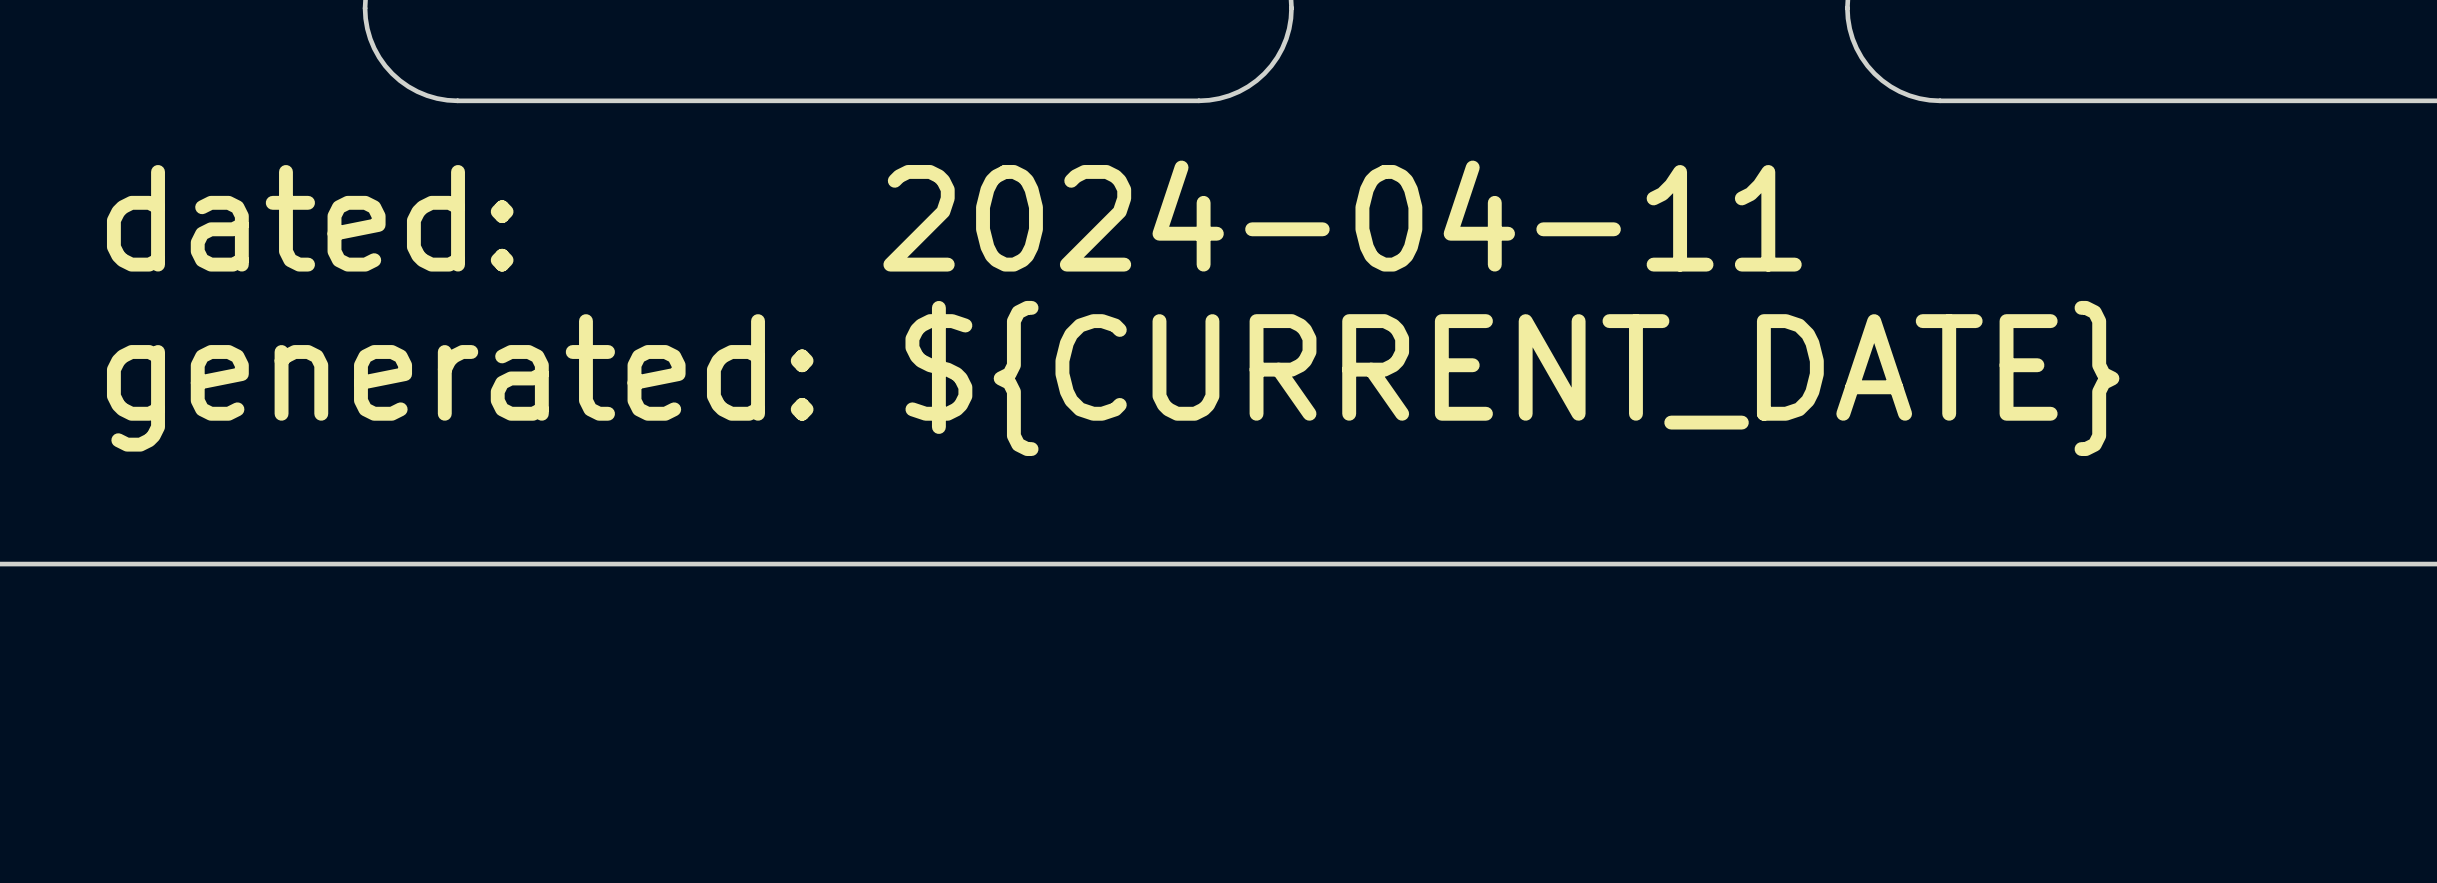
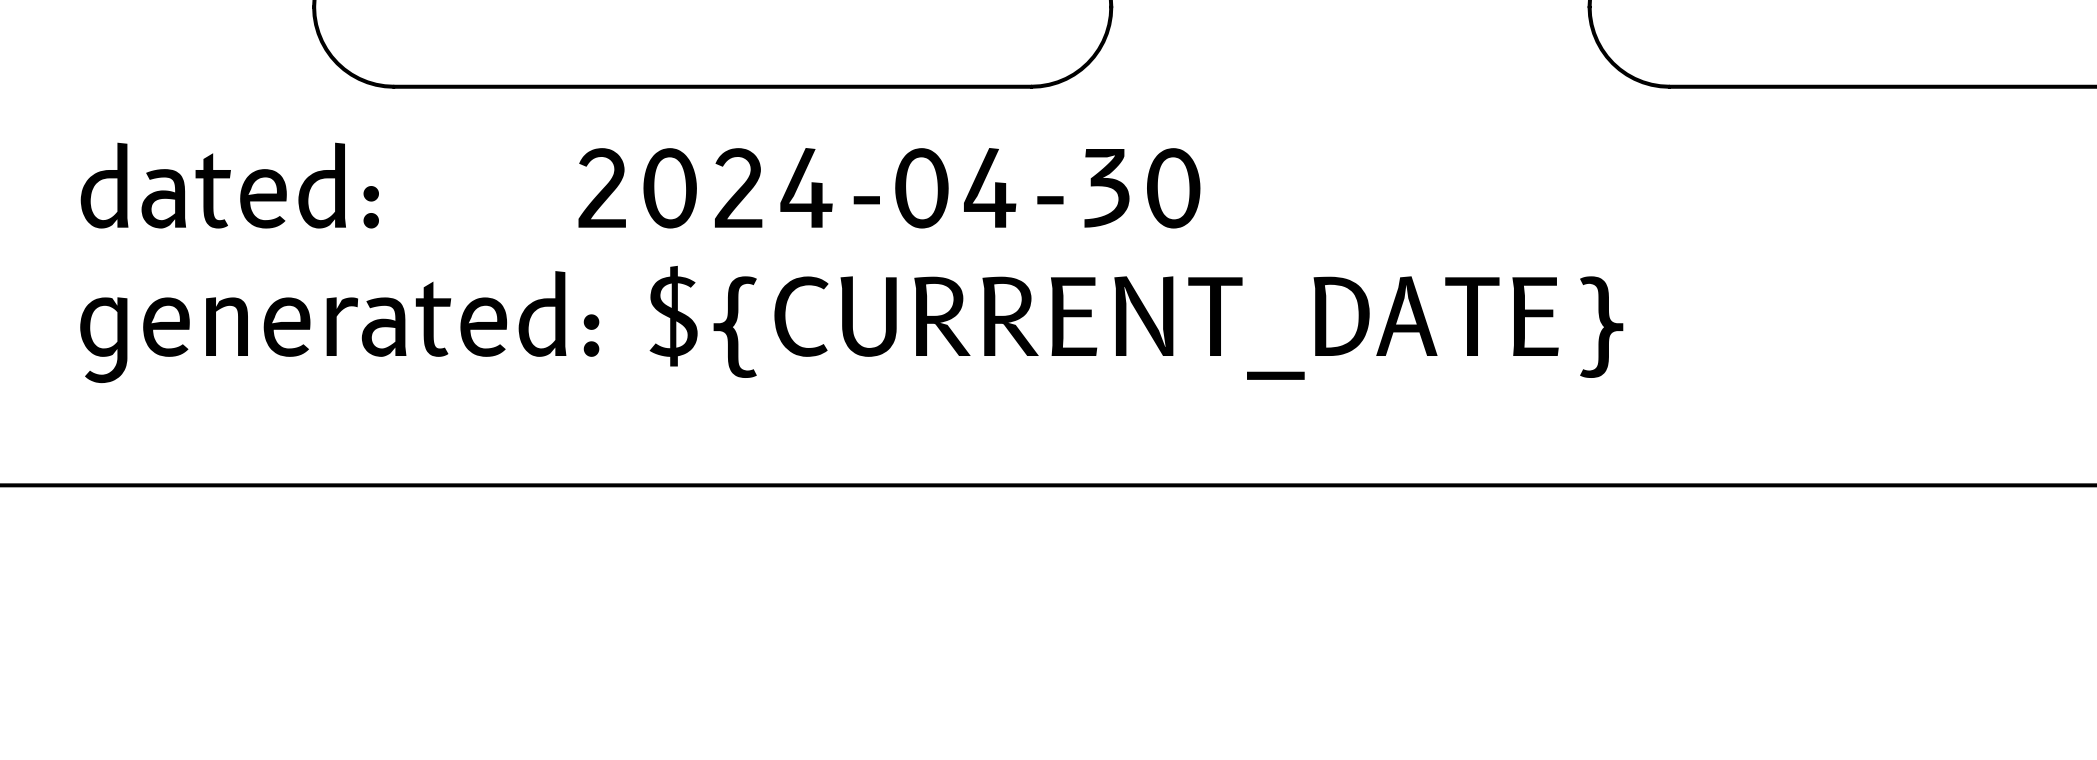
text: dated: 2024-04-11 (954, 216) -> dated: 2024-04-30 (640, 185)

